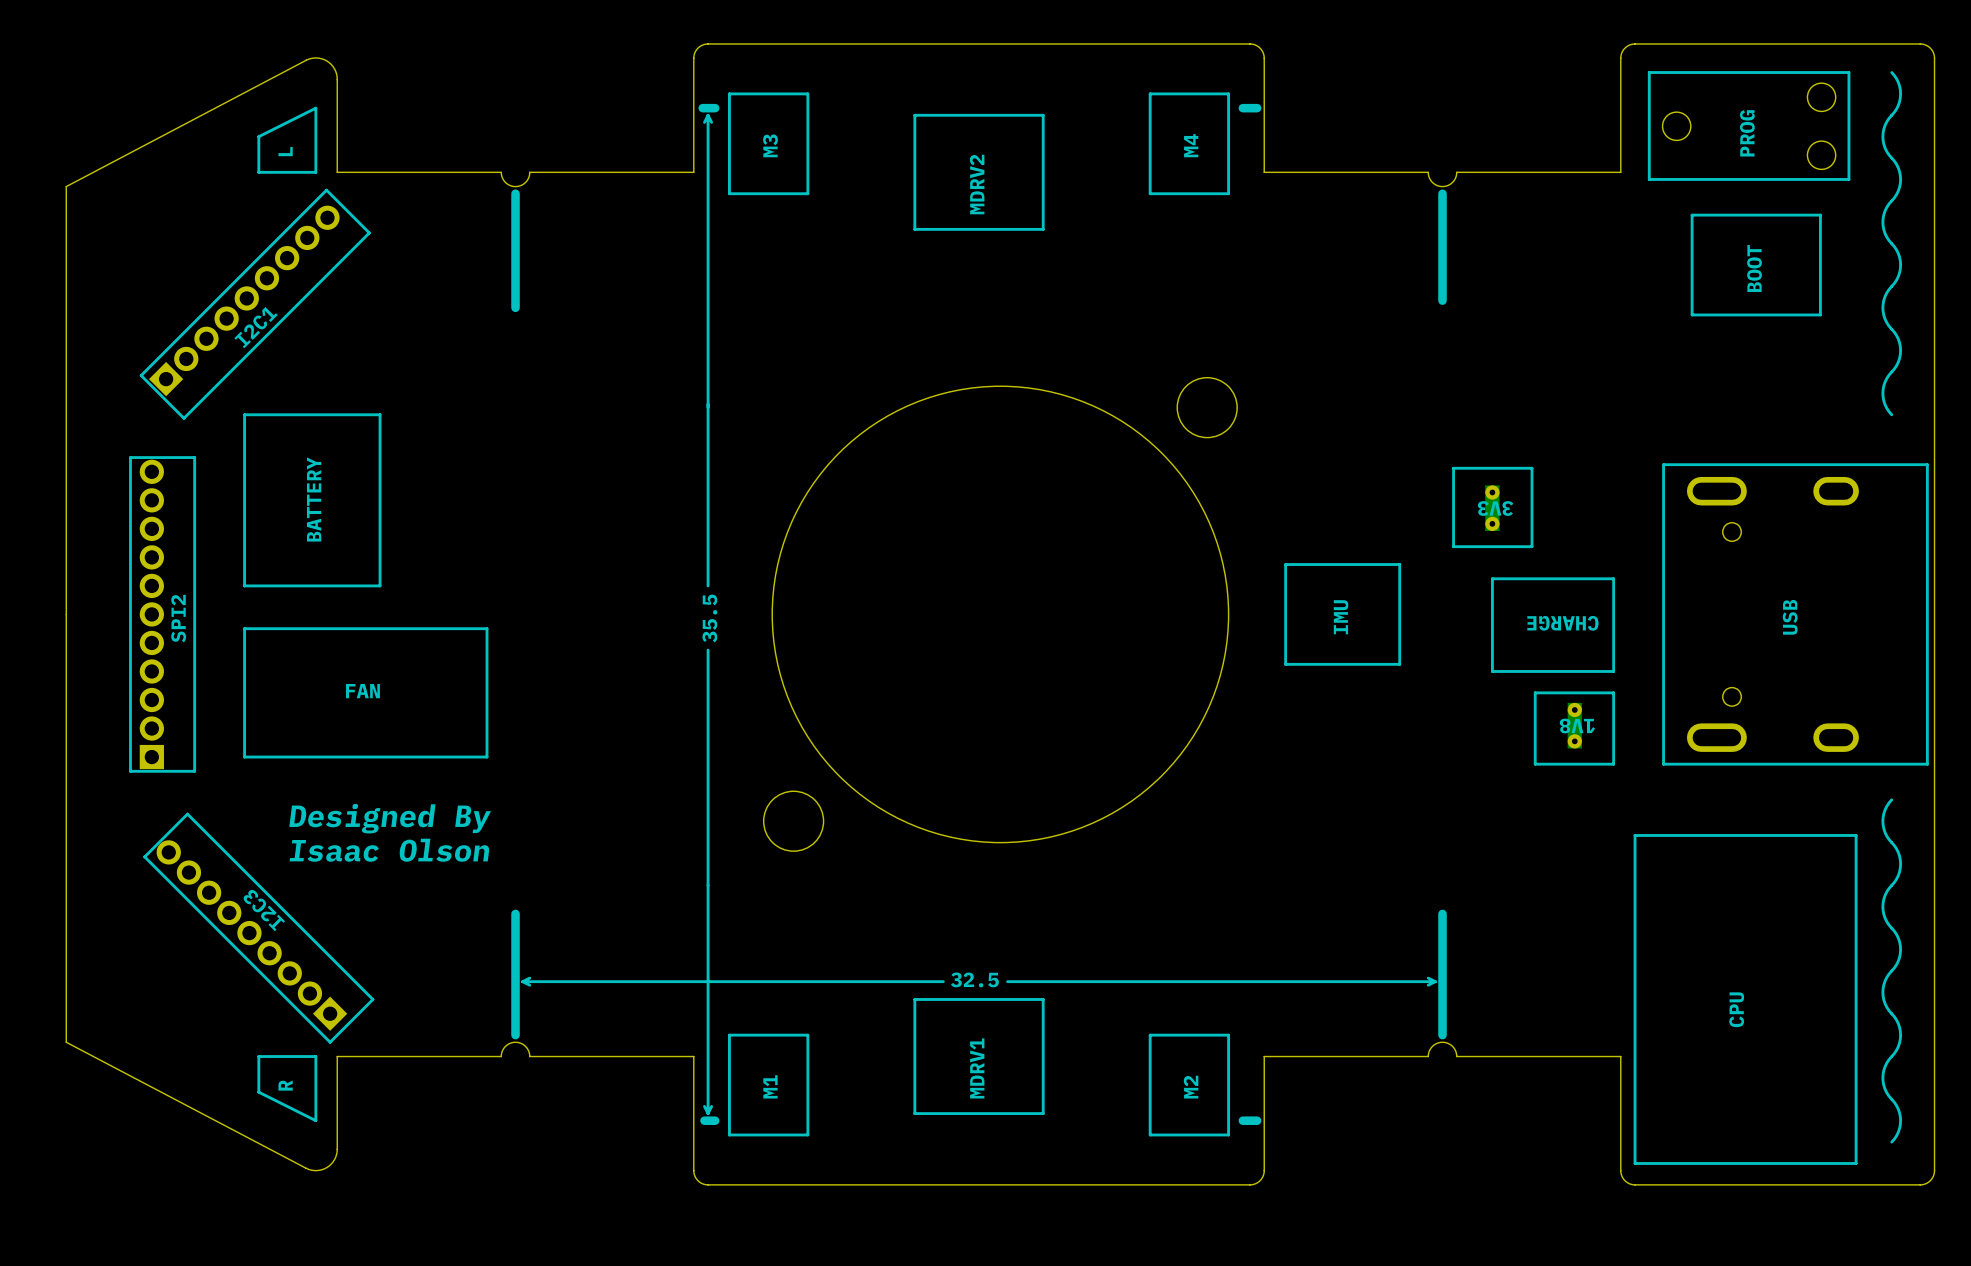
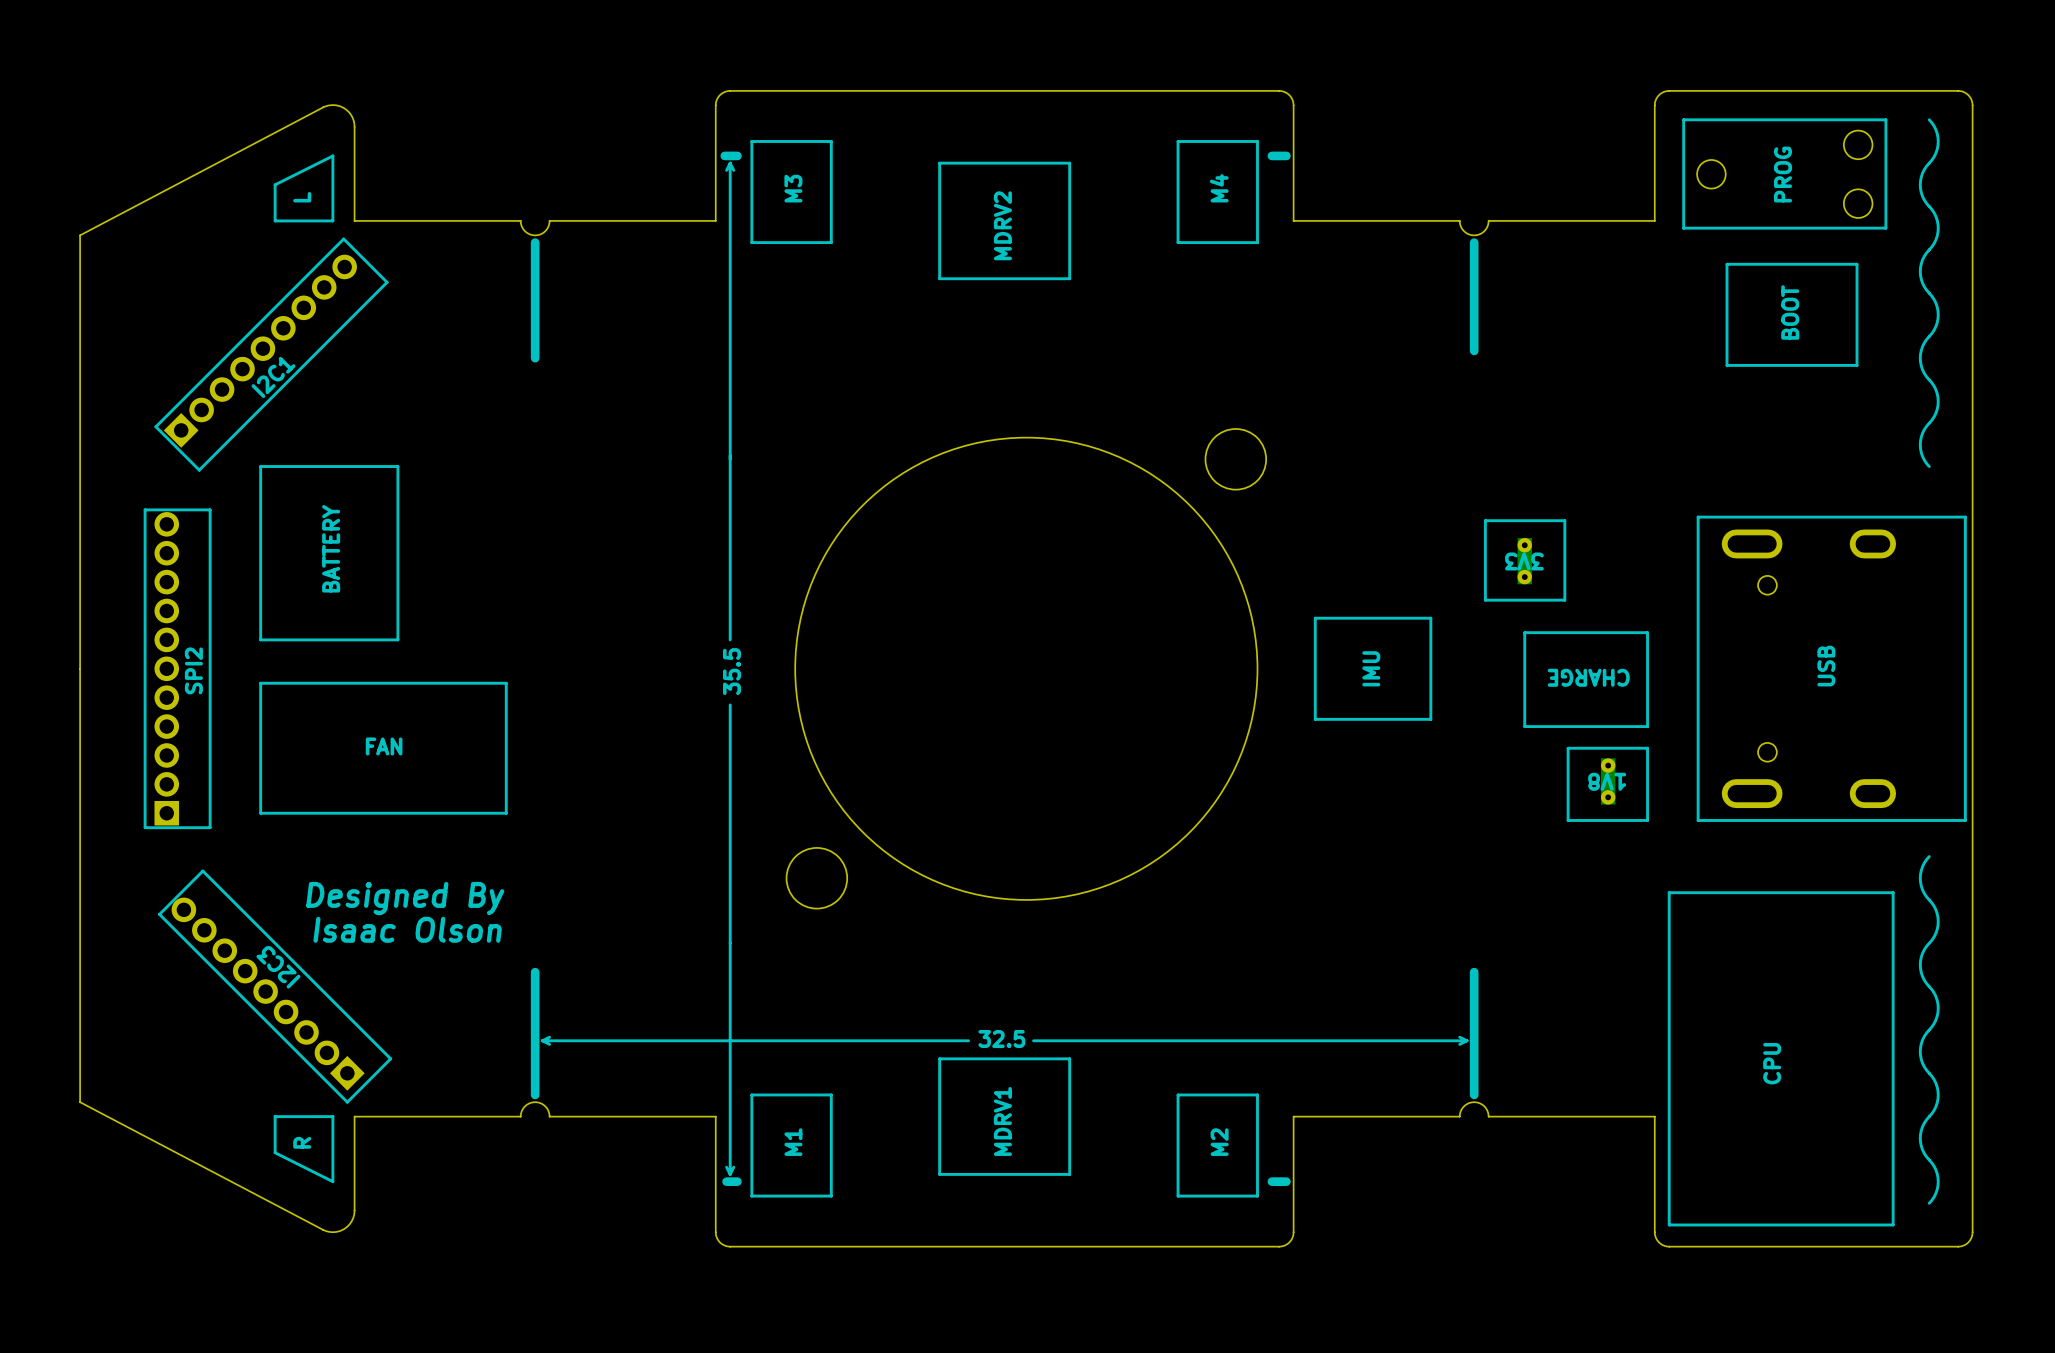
text position: Designed By (390, 818) -> Designed By (405, 898)
text position: Isaac Olson (389, 850) -> Isaac Olson (407, 929)

